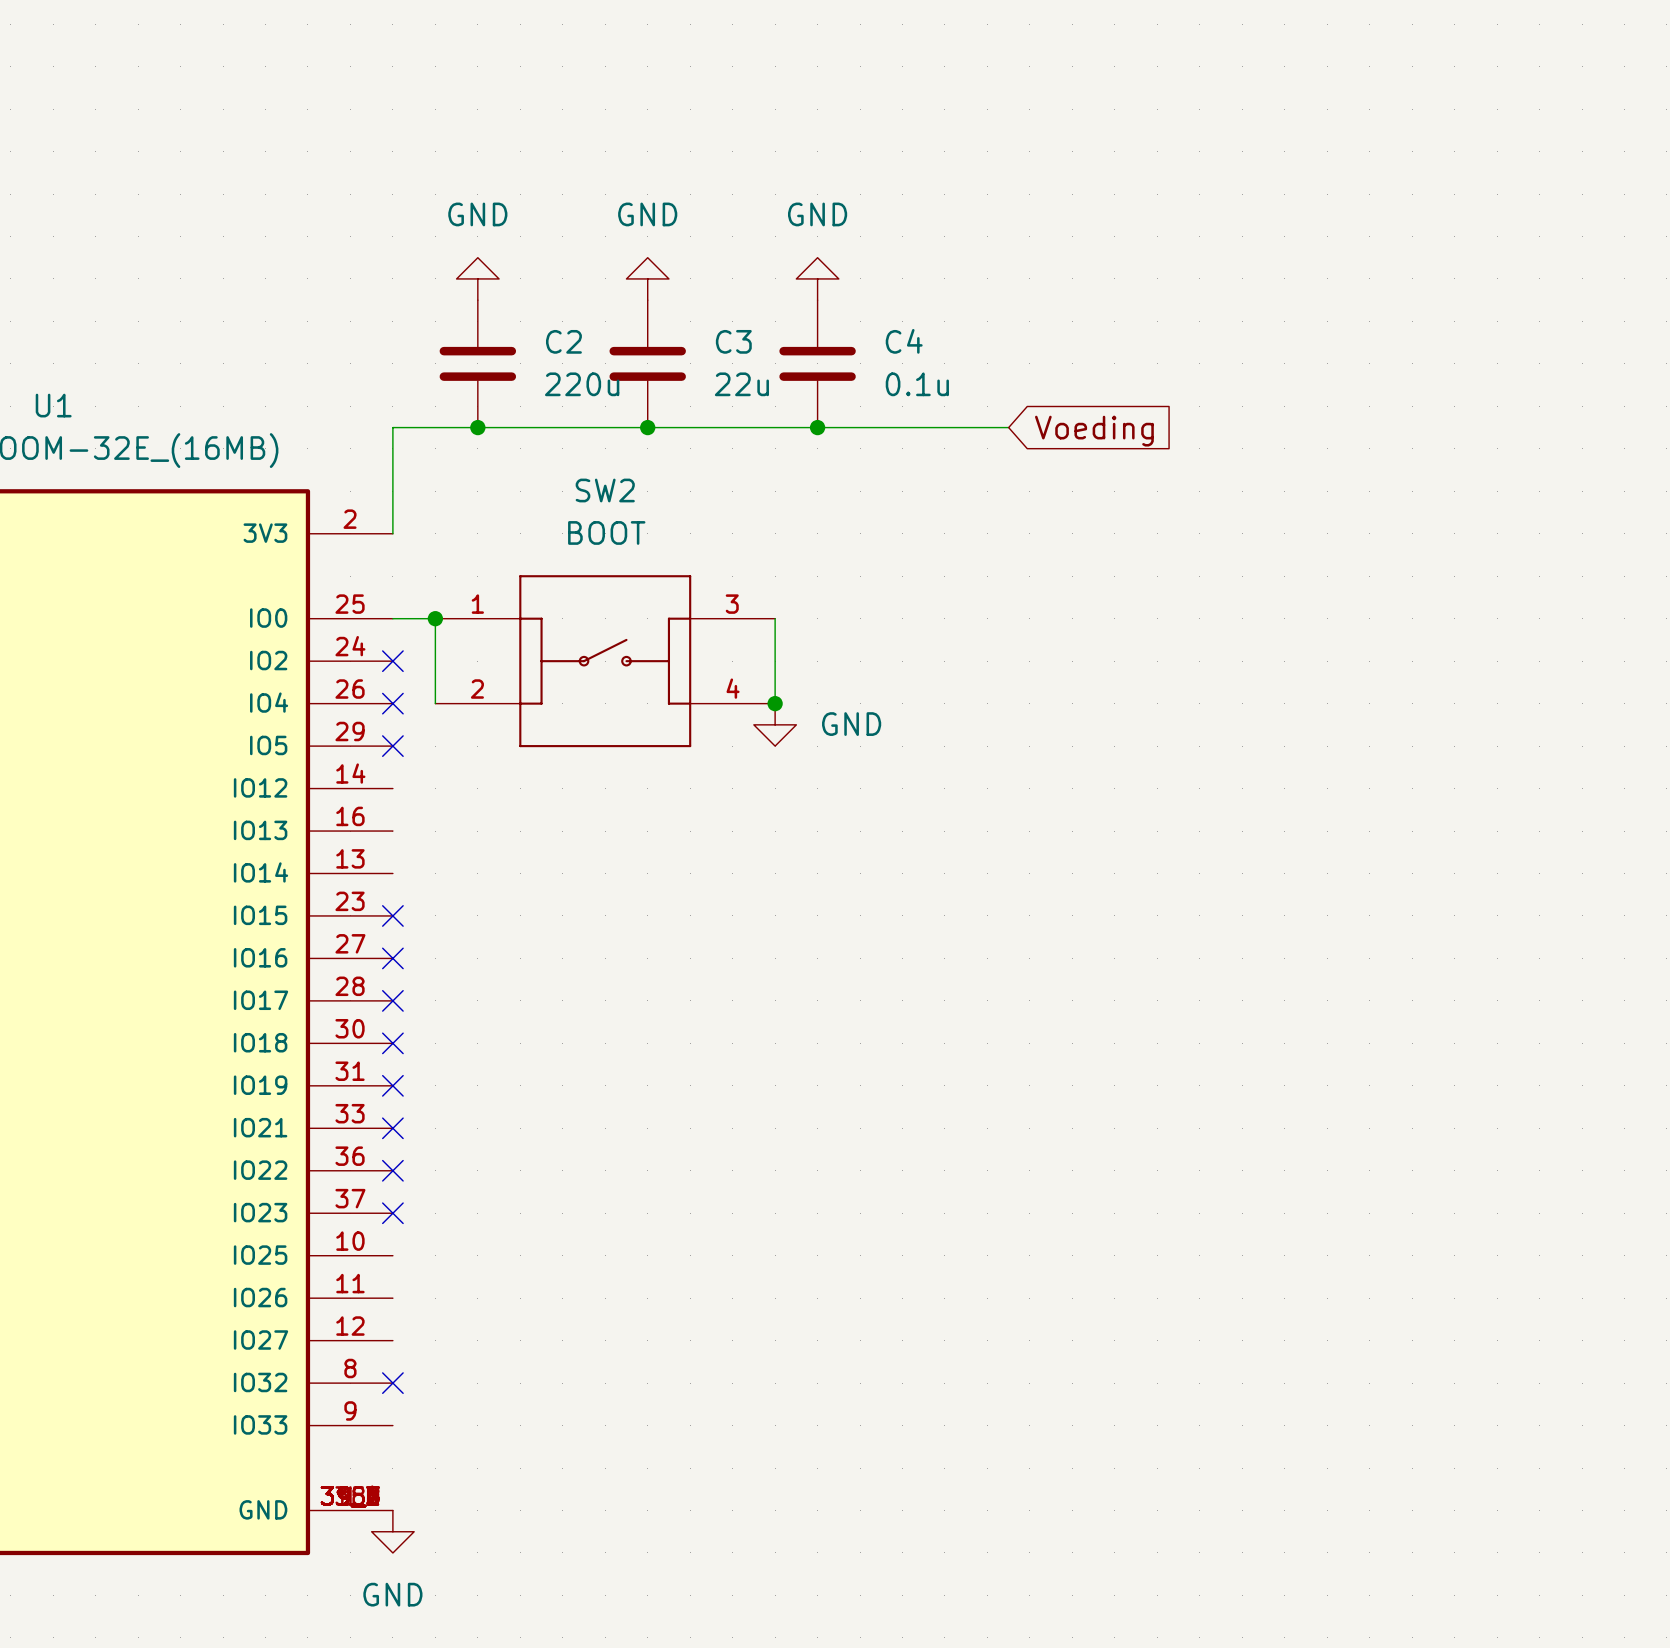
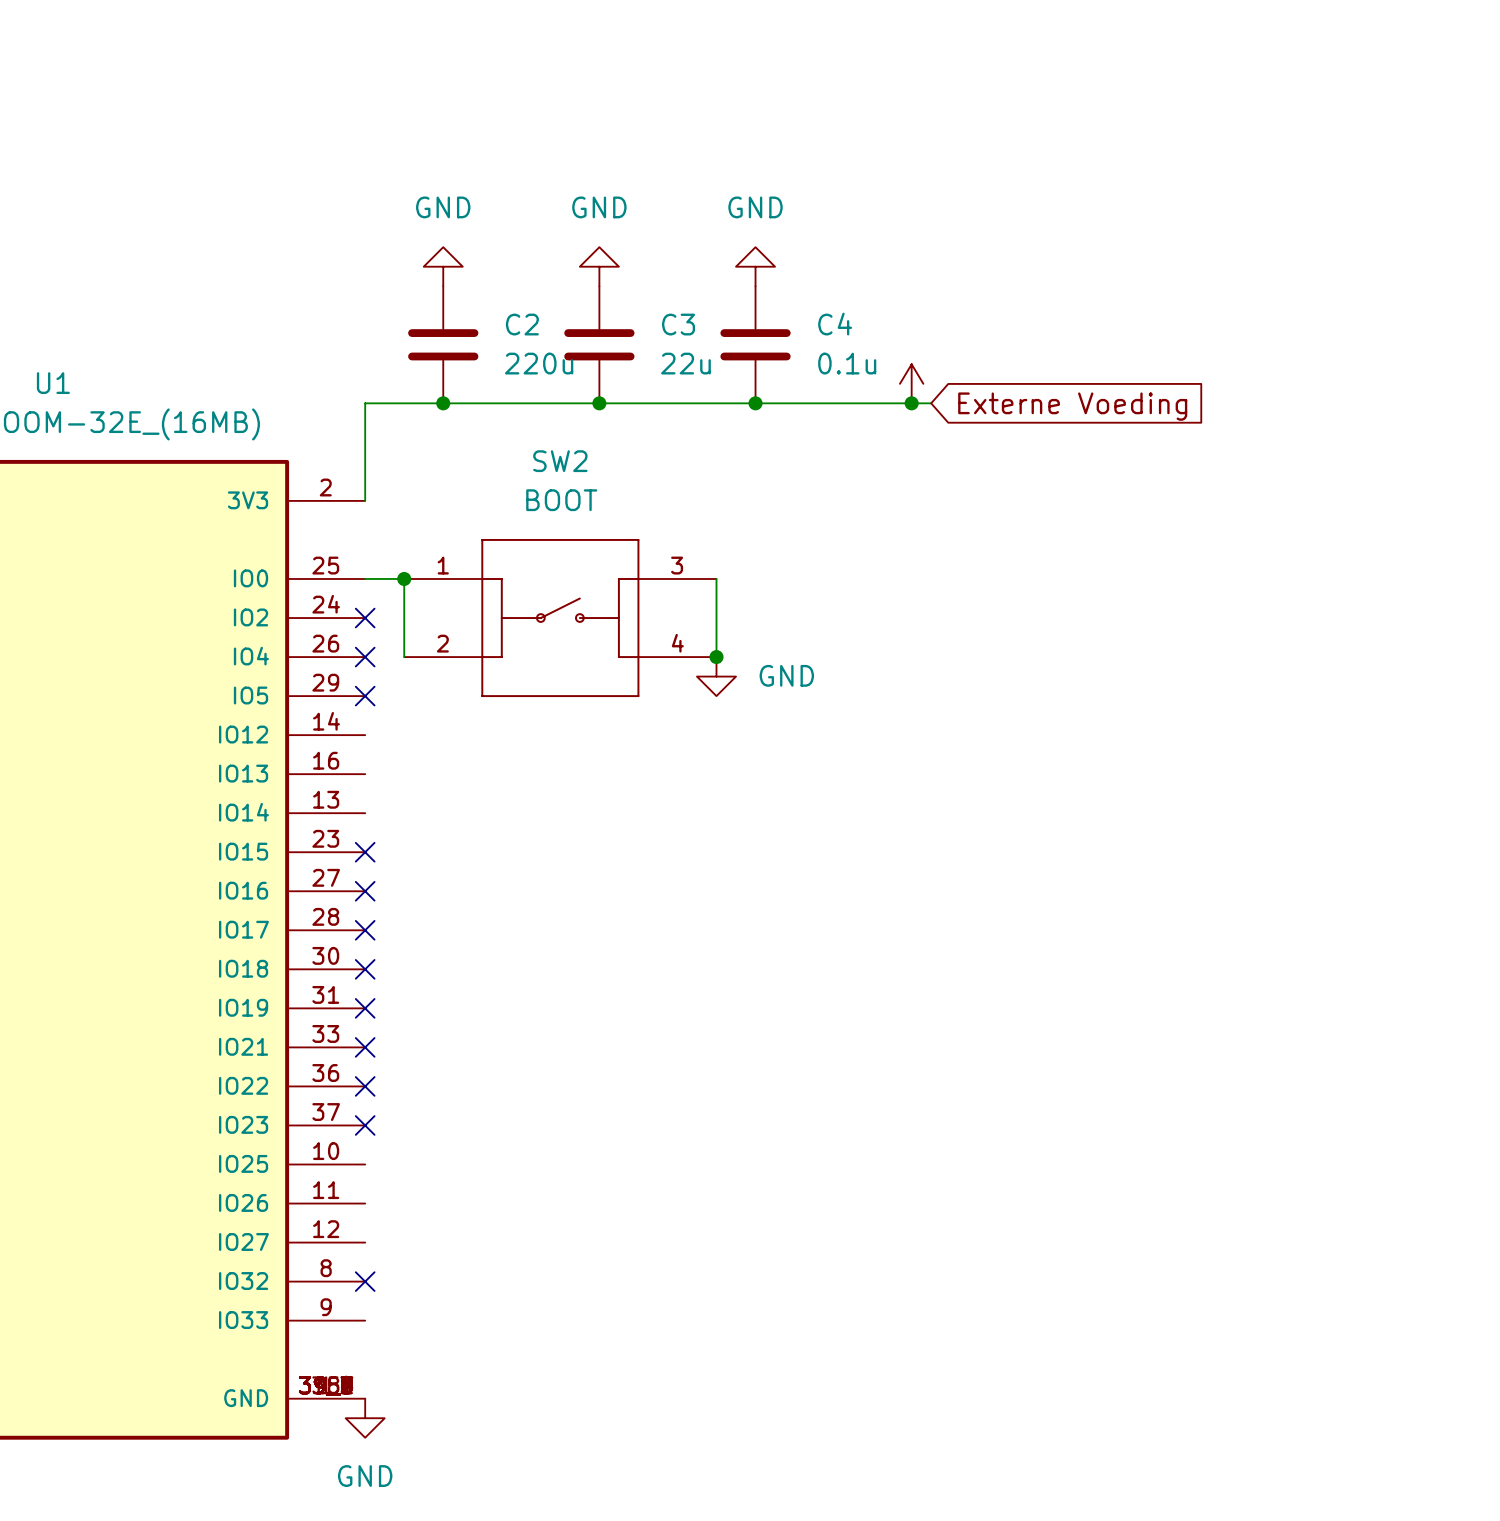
power symbol: none -> (911, 383)
junction: none -> (911, 403)
global label: Voeding (1094, 431) -> Externe Voeding (1072, 406)

